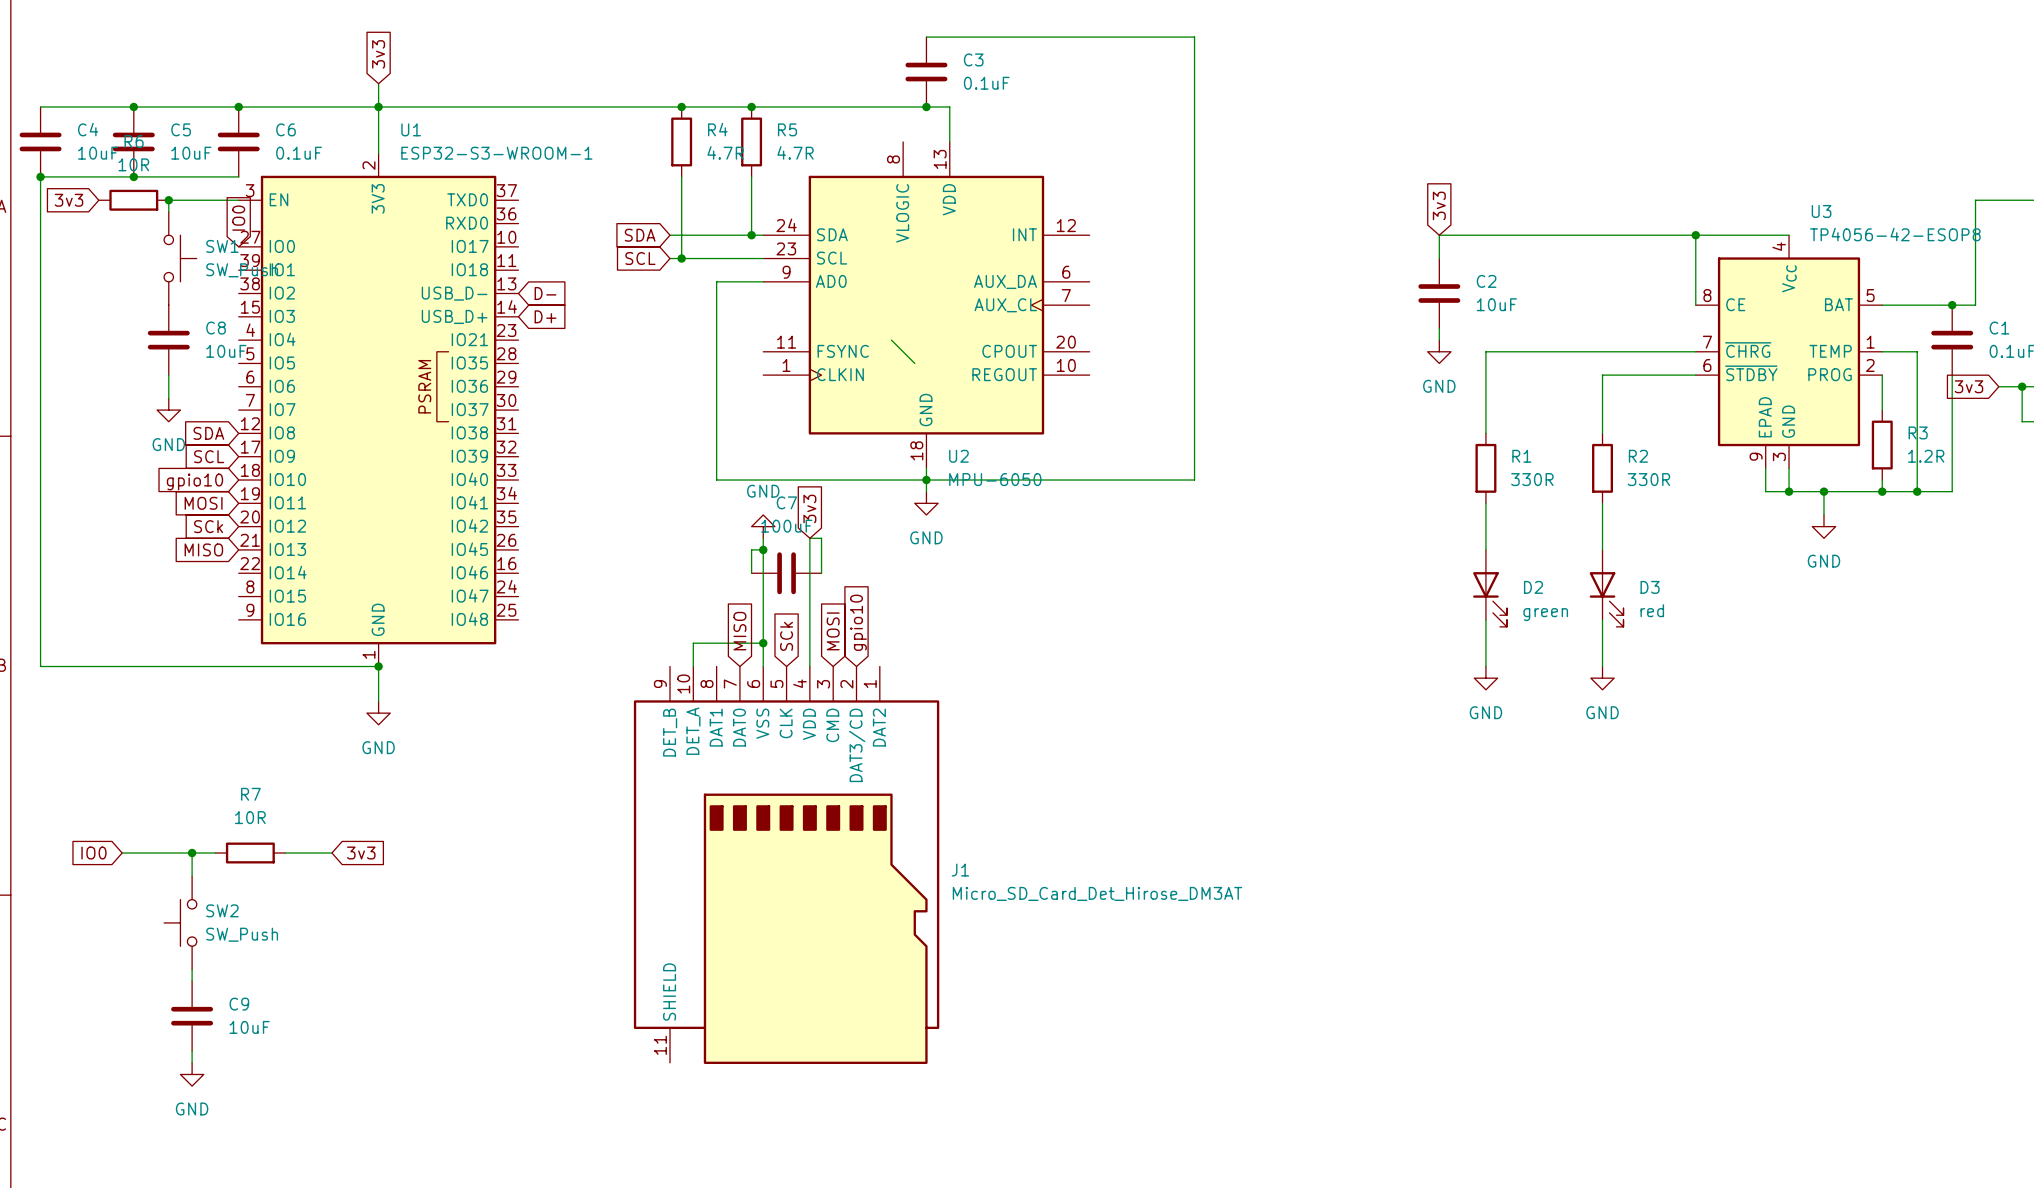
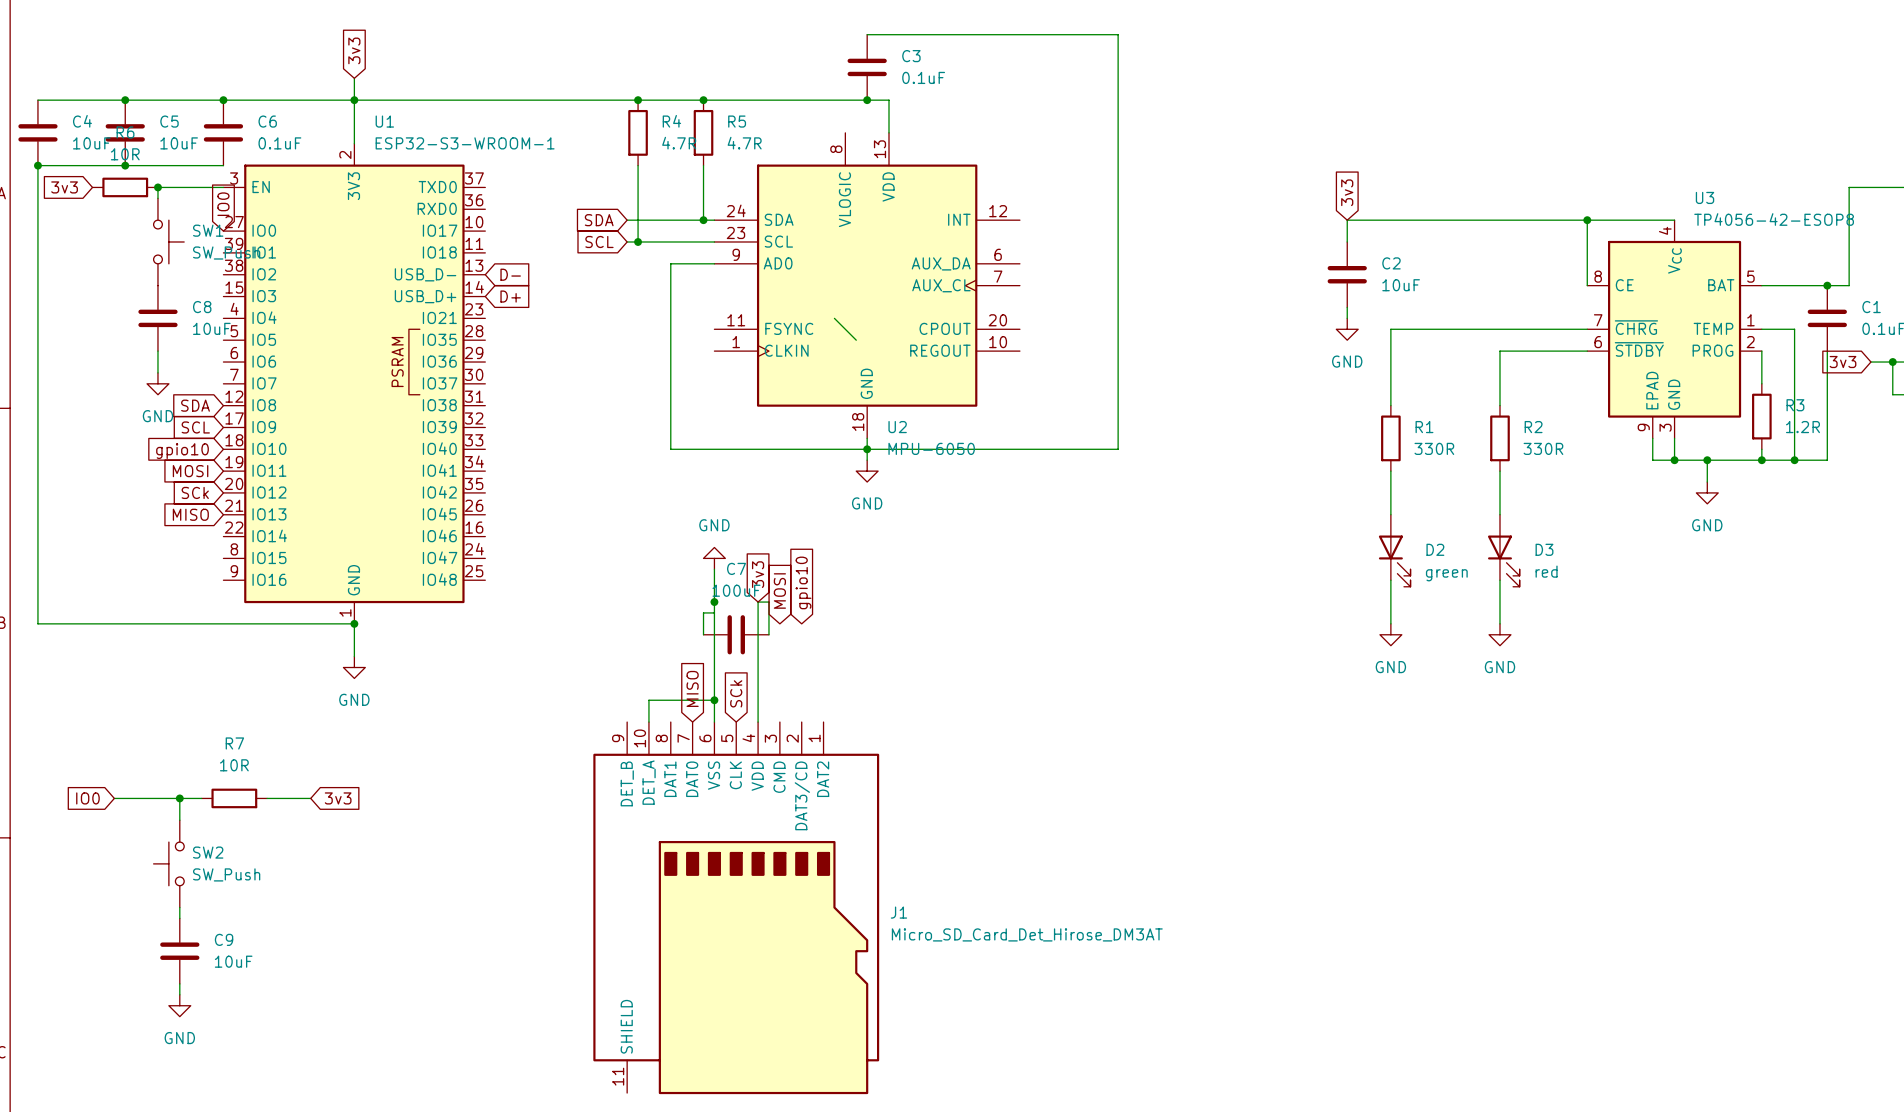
global label position: 3v3 (809, 508) -> 3v3 (758, 574)
power symbol position: GND (763, 526) -> GND (714, 558)
wire: (763, 538) (763, 608) -> none
wire: (763, 549) (751, 549) (751, 573) -> (714, 612) (703, 612) (703, 634)
junction: (763, 549) -> none
C7 position: (786, 573) -> (736, 634)
wire: (821, 573) (821, 538) (809, 538) (809, 643) -> (768, 634) (768, 602) (758, 602)
global label position: MISO (739, 631) -> MISO (692, 688)
global label position: SCk (786, 636) -> SCk (736, 693)
wire: (763, 643) (693, 643) (693, 666) -> (714, 700) (648, 700) (648, 722)
wire: none -> (714, 623) (714, 722)
wire: none -> (758, 623) (758, 722)
junction: none -> (714, 700)
J1 position: (786, 865) -> (736, 908)

